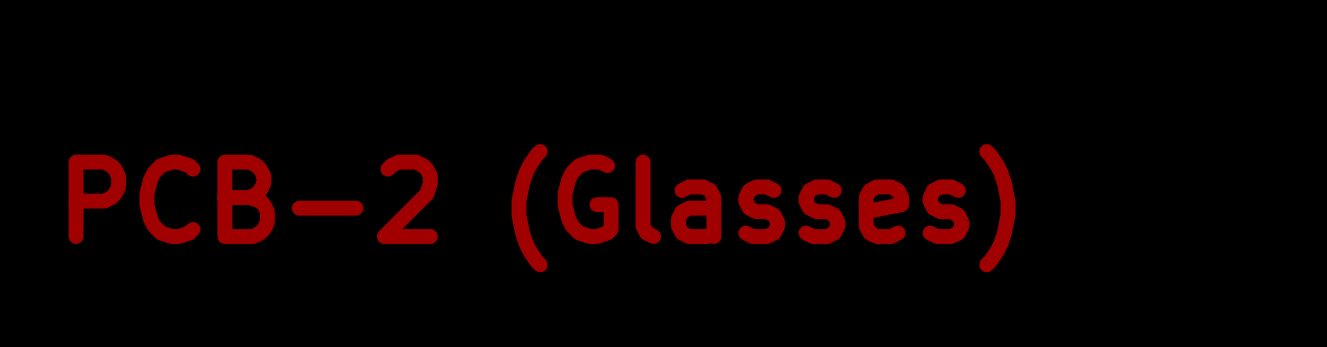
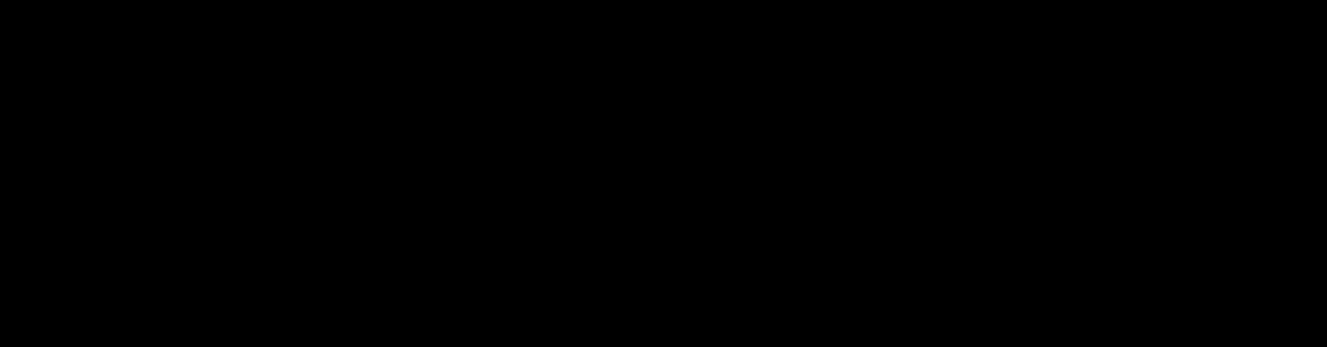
text: PCB-2 (Glasses) (542, 208) -> none

